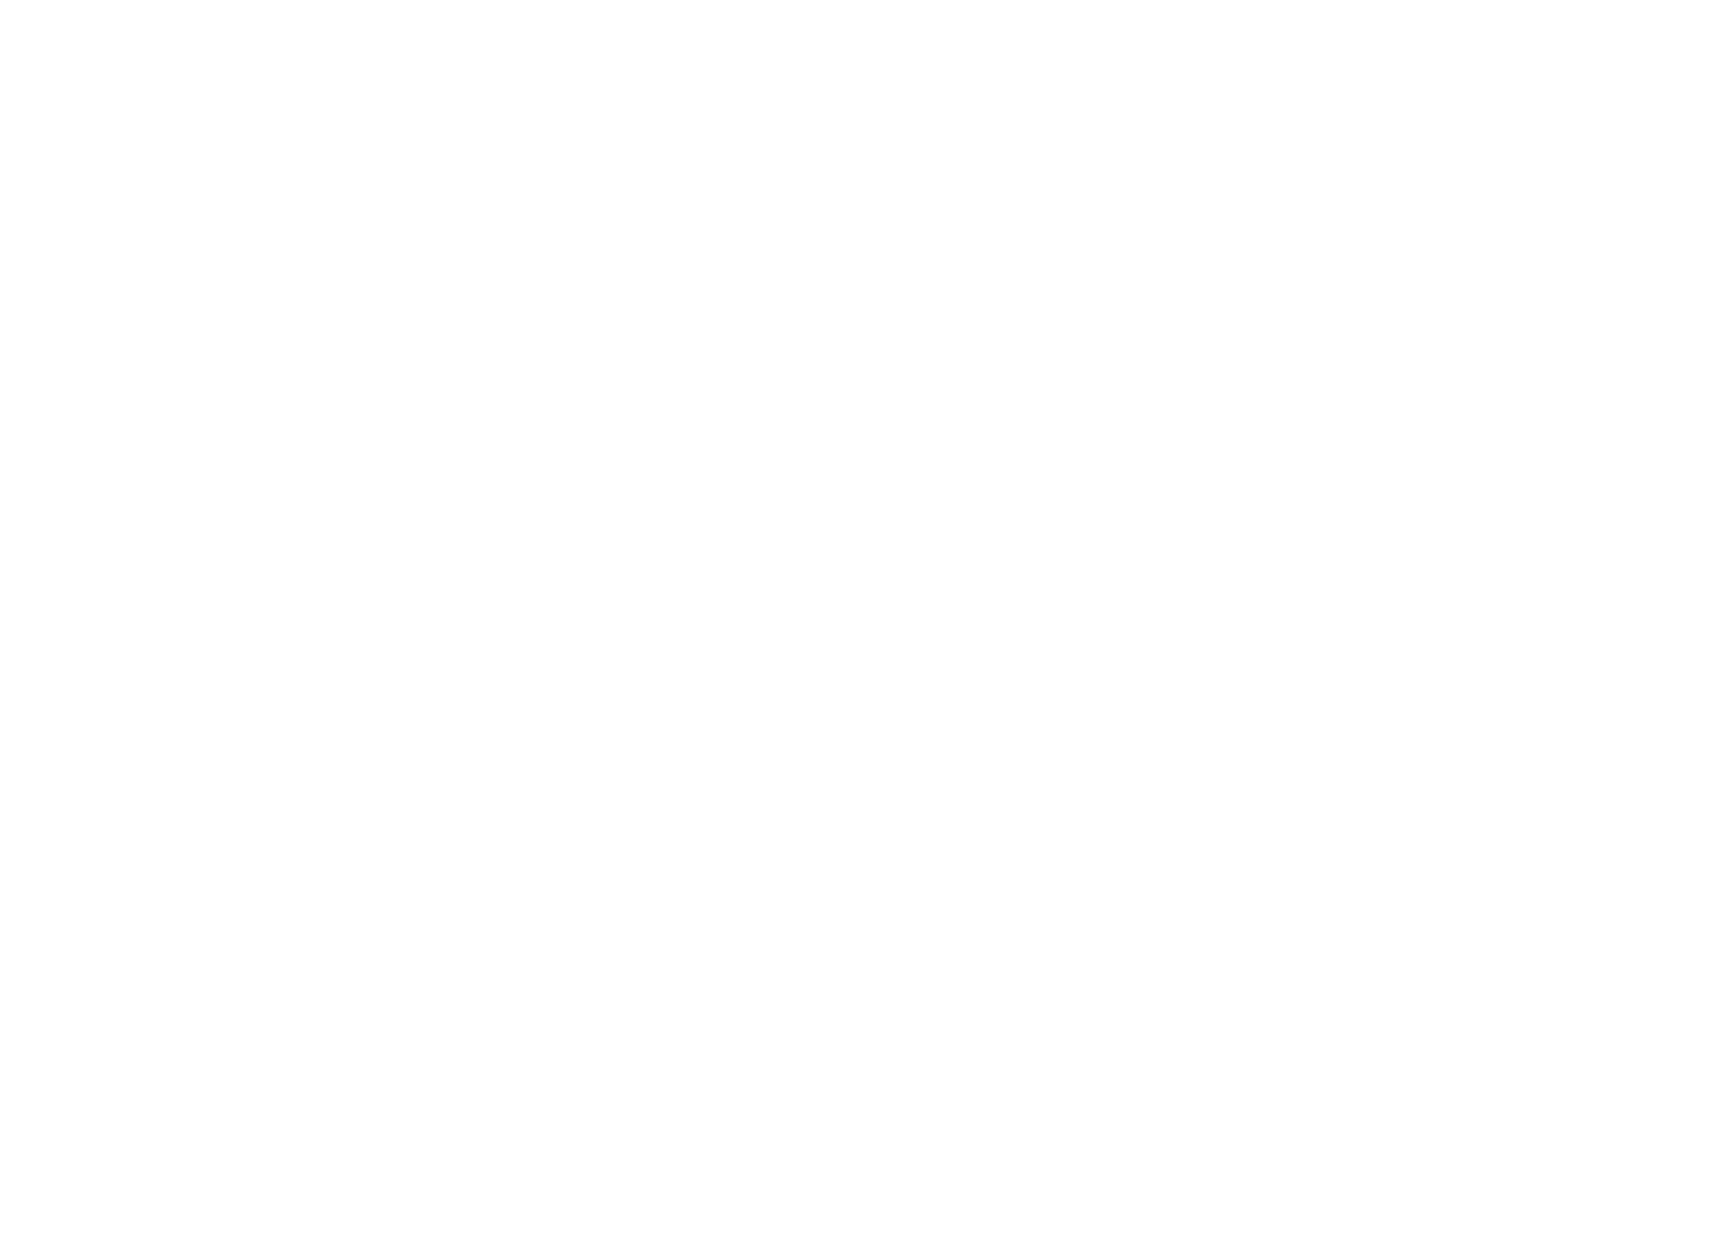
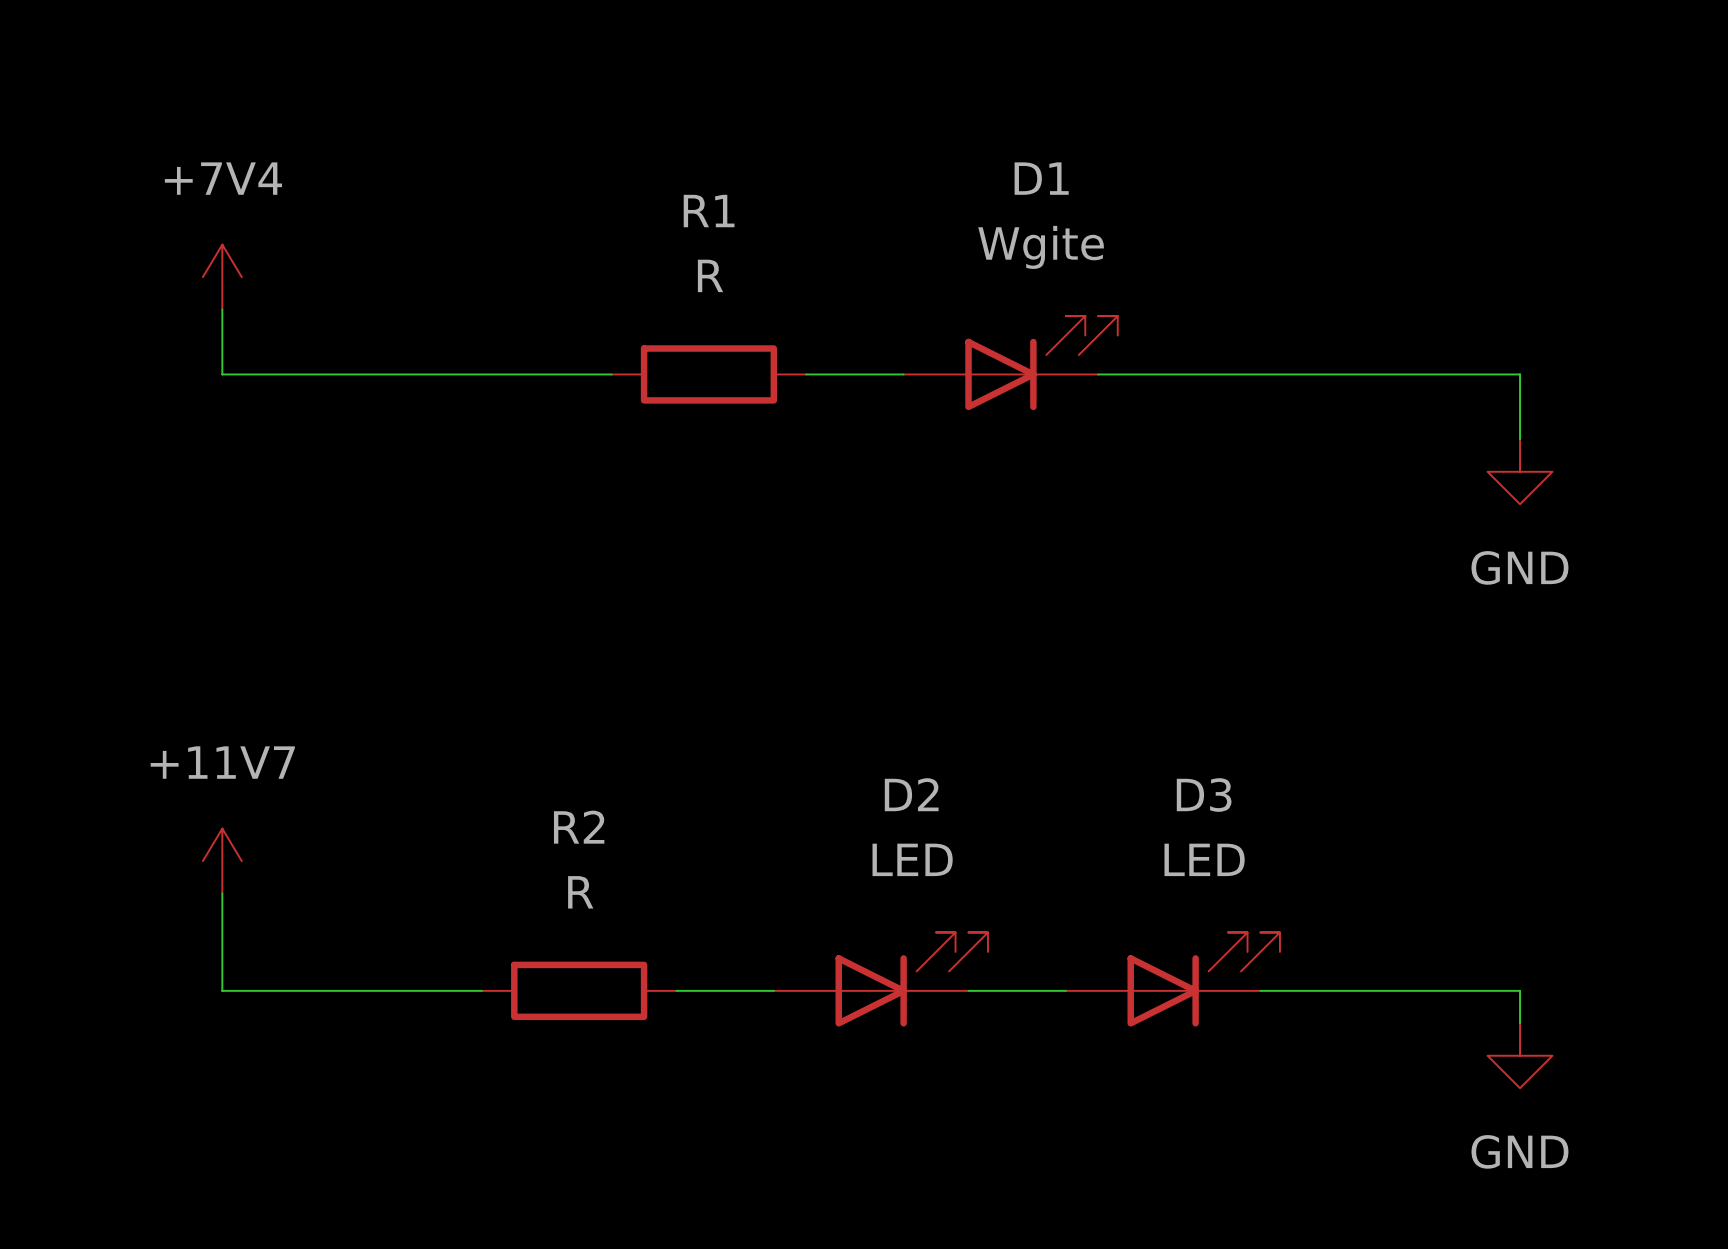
power symbol: none -> +7V4 (222, 277)
wire: none -> (222, 309) (222, 374) (611, 374)
D1: none -> Wgite (1010, 363)
R1: none -> R (708, 374)
wire: none -> (806, 374) (903, 374)
wire: none -> (1098, 374) (1520, 374) (1520, 439)
power symbol: none -> GND (1520, 471)
power symbol: none -> +11V7 (222, 861)
wire: none -> (222, 893) (222, 990) (481, 990)
D2: none -> LED (880, 979)
D3: none -> LED (1172, 979)
R2: none -> R (579, 990)
wire: none -> (676, 990) (773, 990)
wire: none -> (968, 990) (1065, 990)
wire: none -> (1260, 990) (1520, 990) (1520, 1023)
power symbol: none -> GND (1520, 1055)

